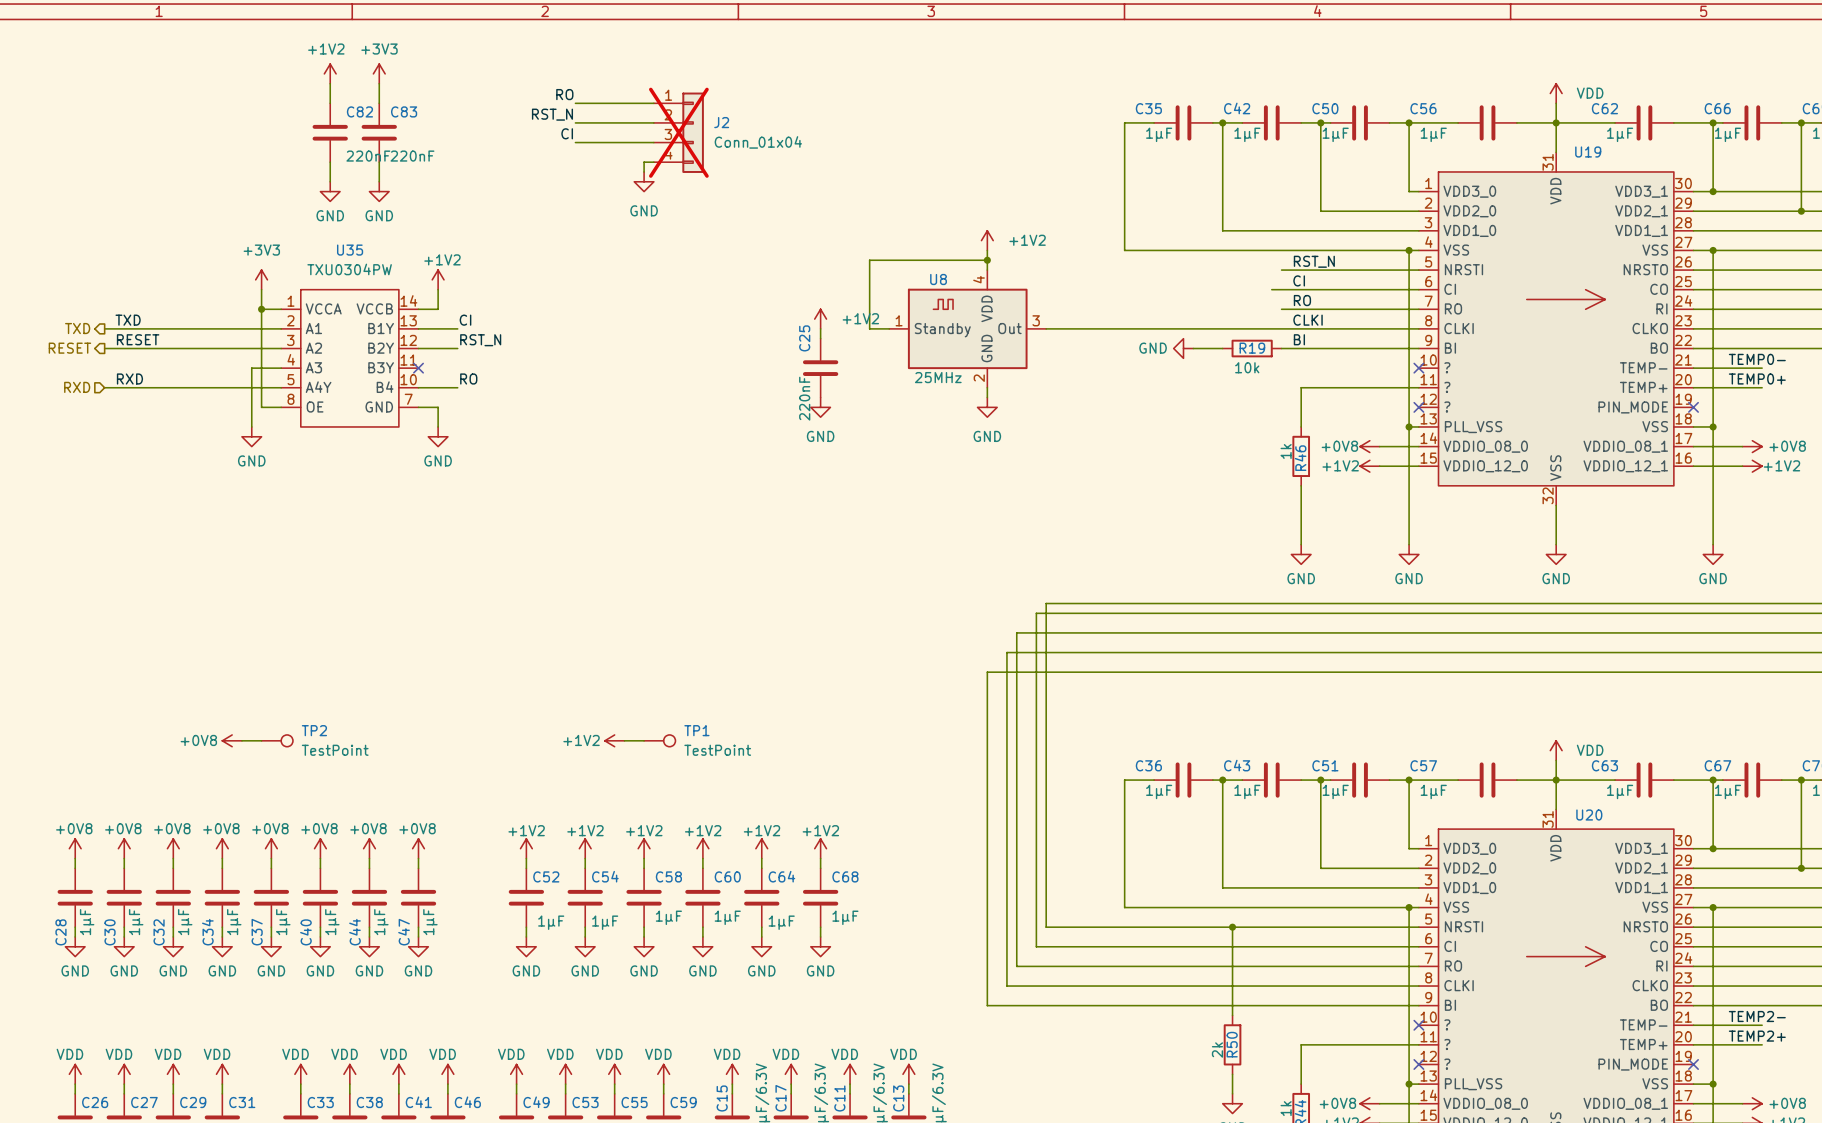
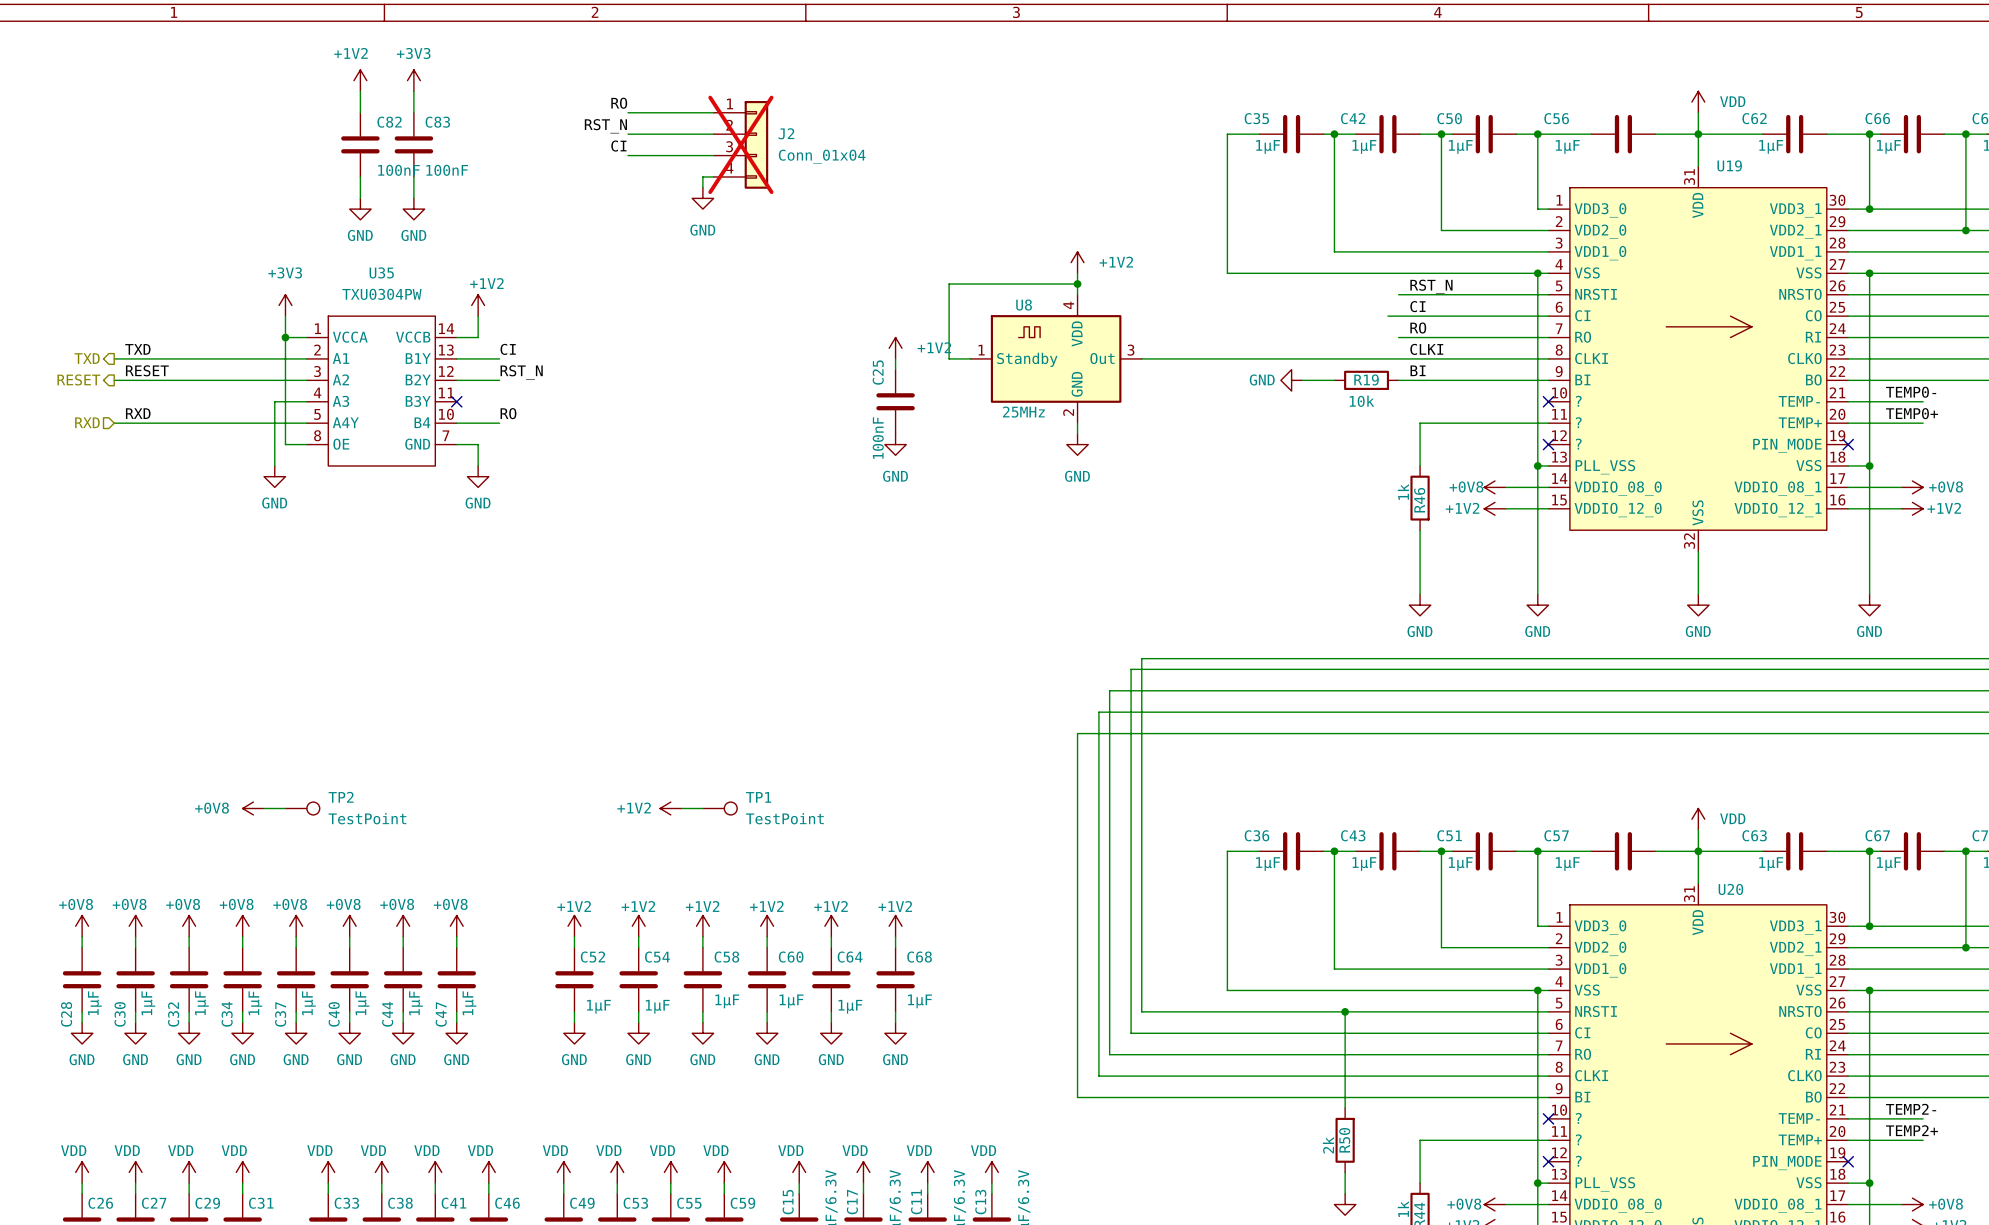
C82 value: 220nF (368, 156) -> 100nF (399, 170)
C83 value: 220nF (412, 156) -> 100nF (447, 170)
C25 value: 220nF (804, 398) -> 100nF (878, 438)

